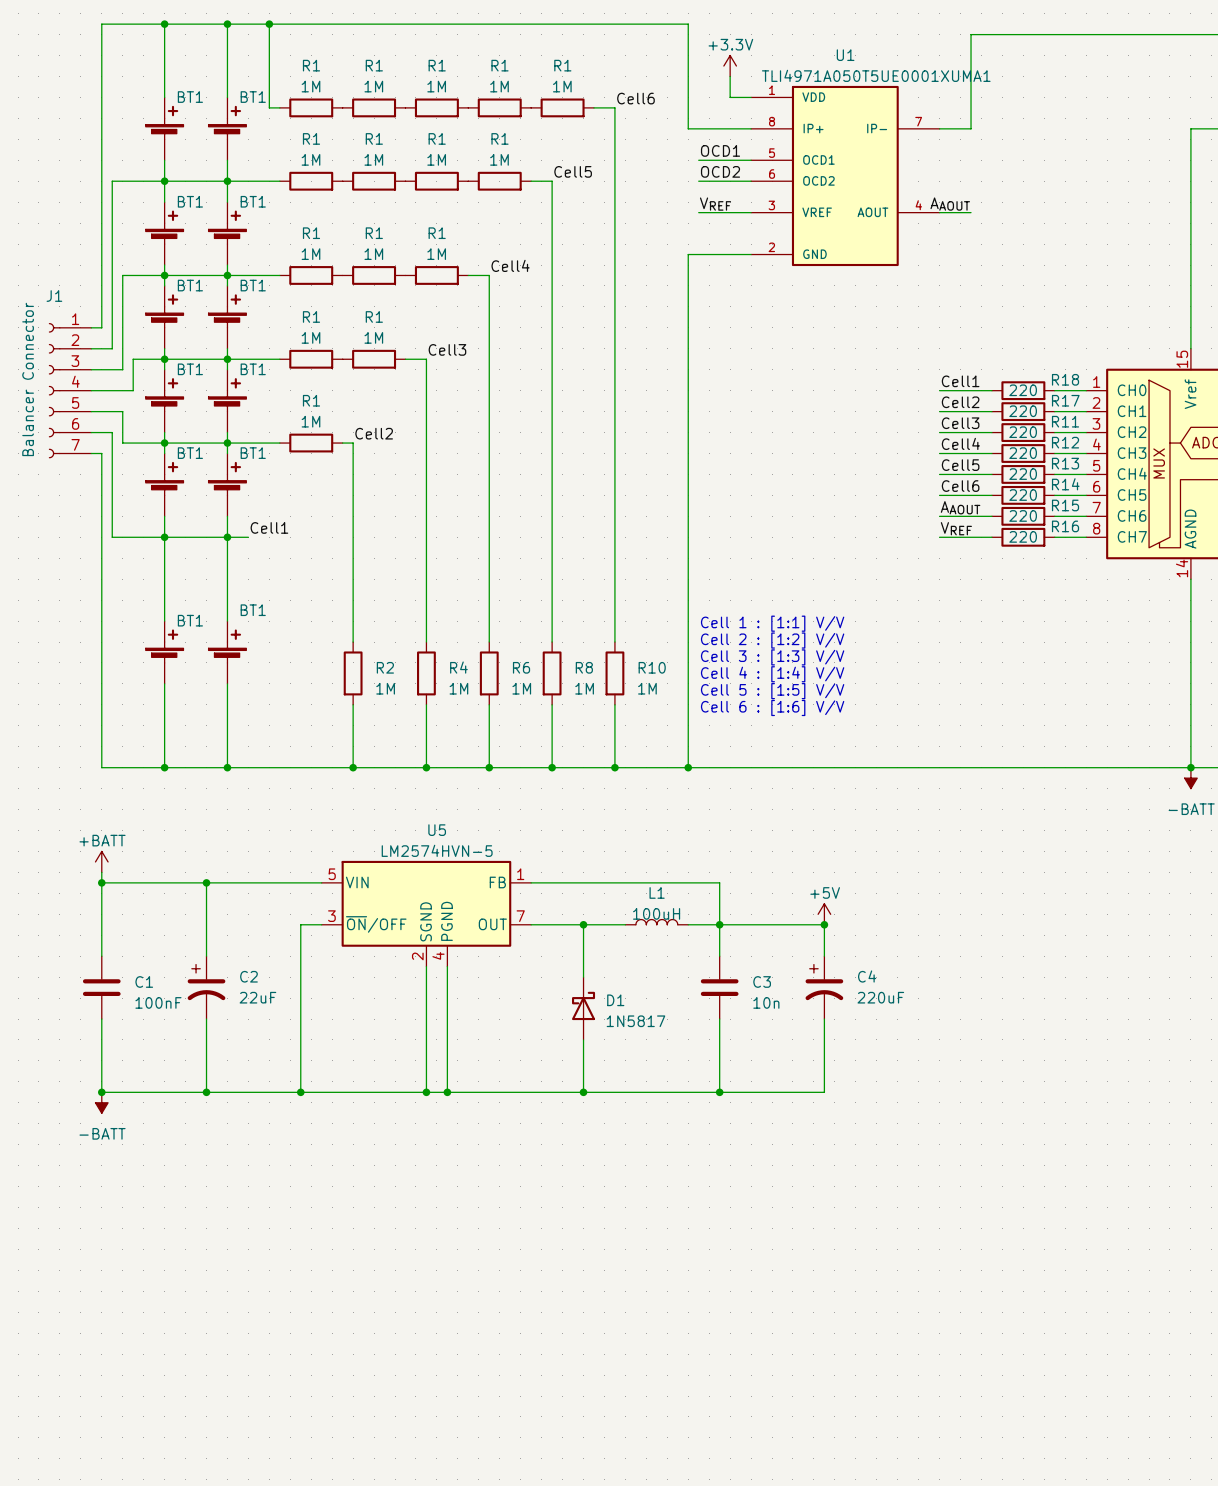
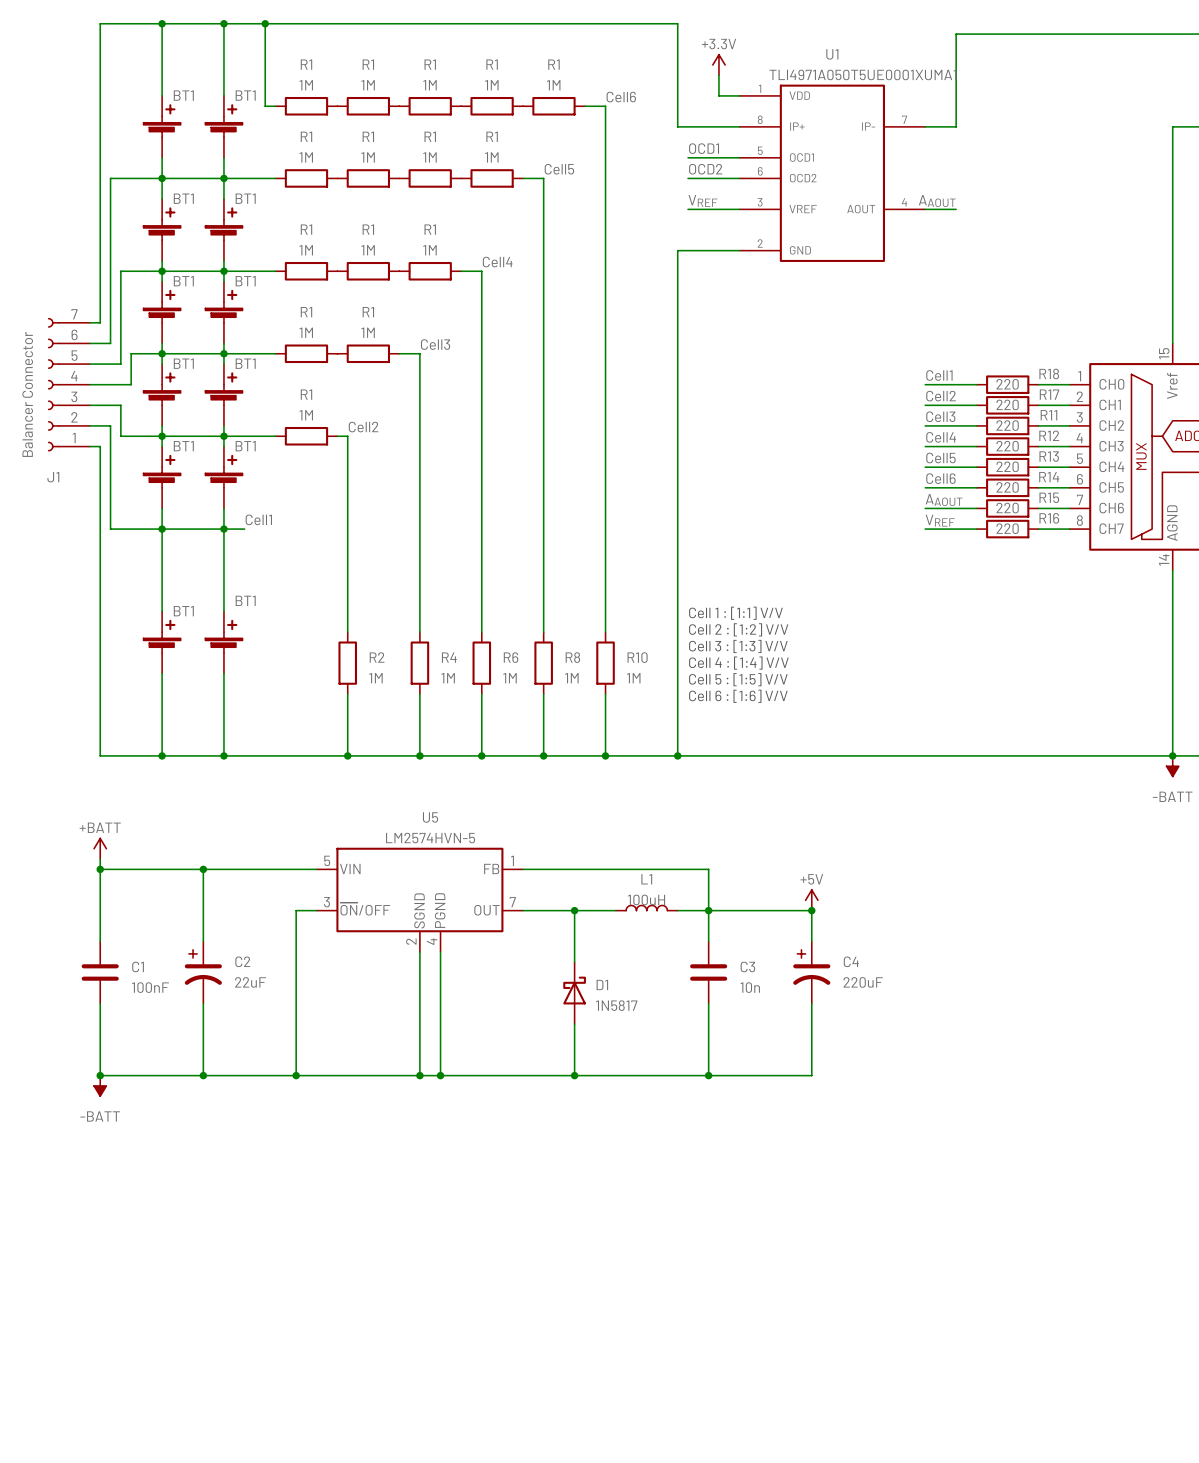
J1 flip: as is (54, 390) -> up-down (53, 384)

